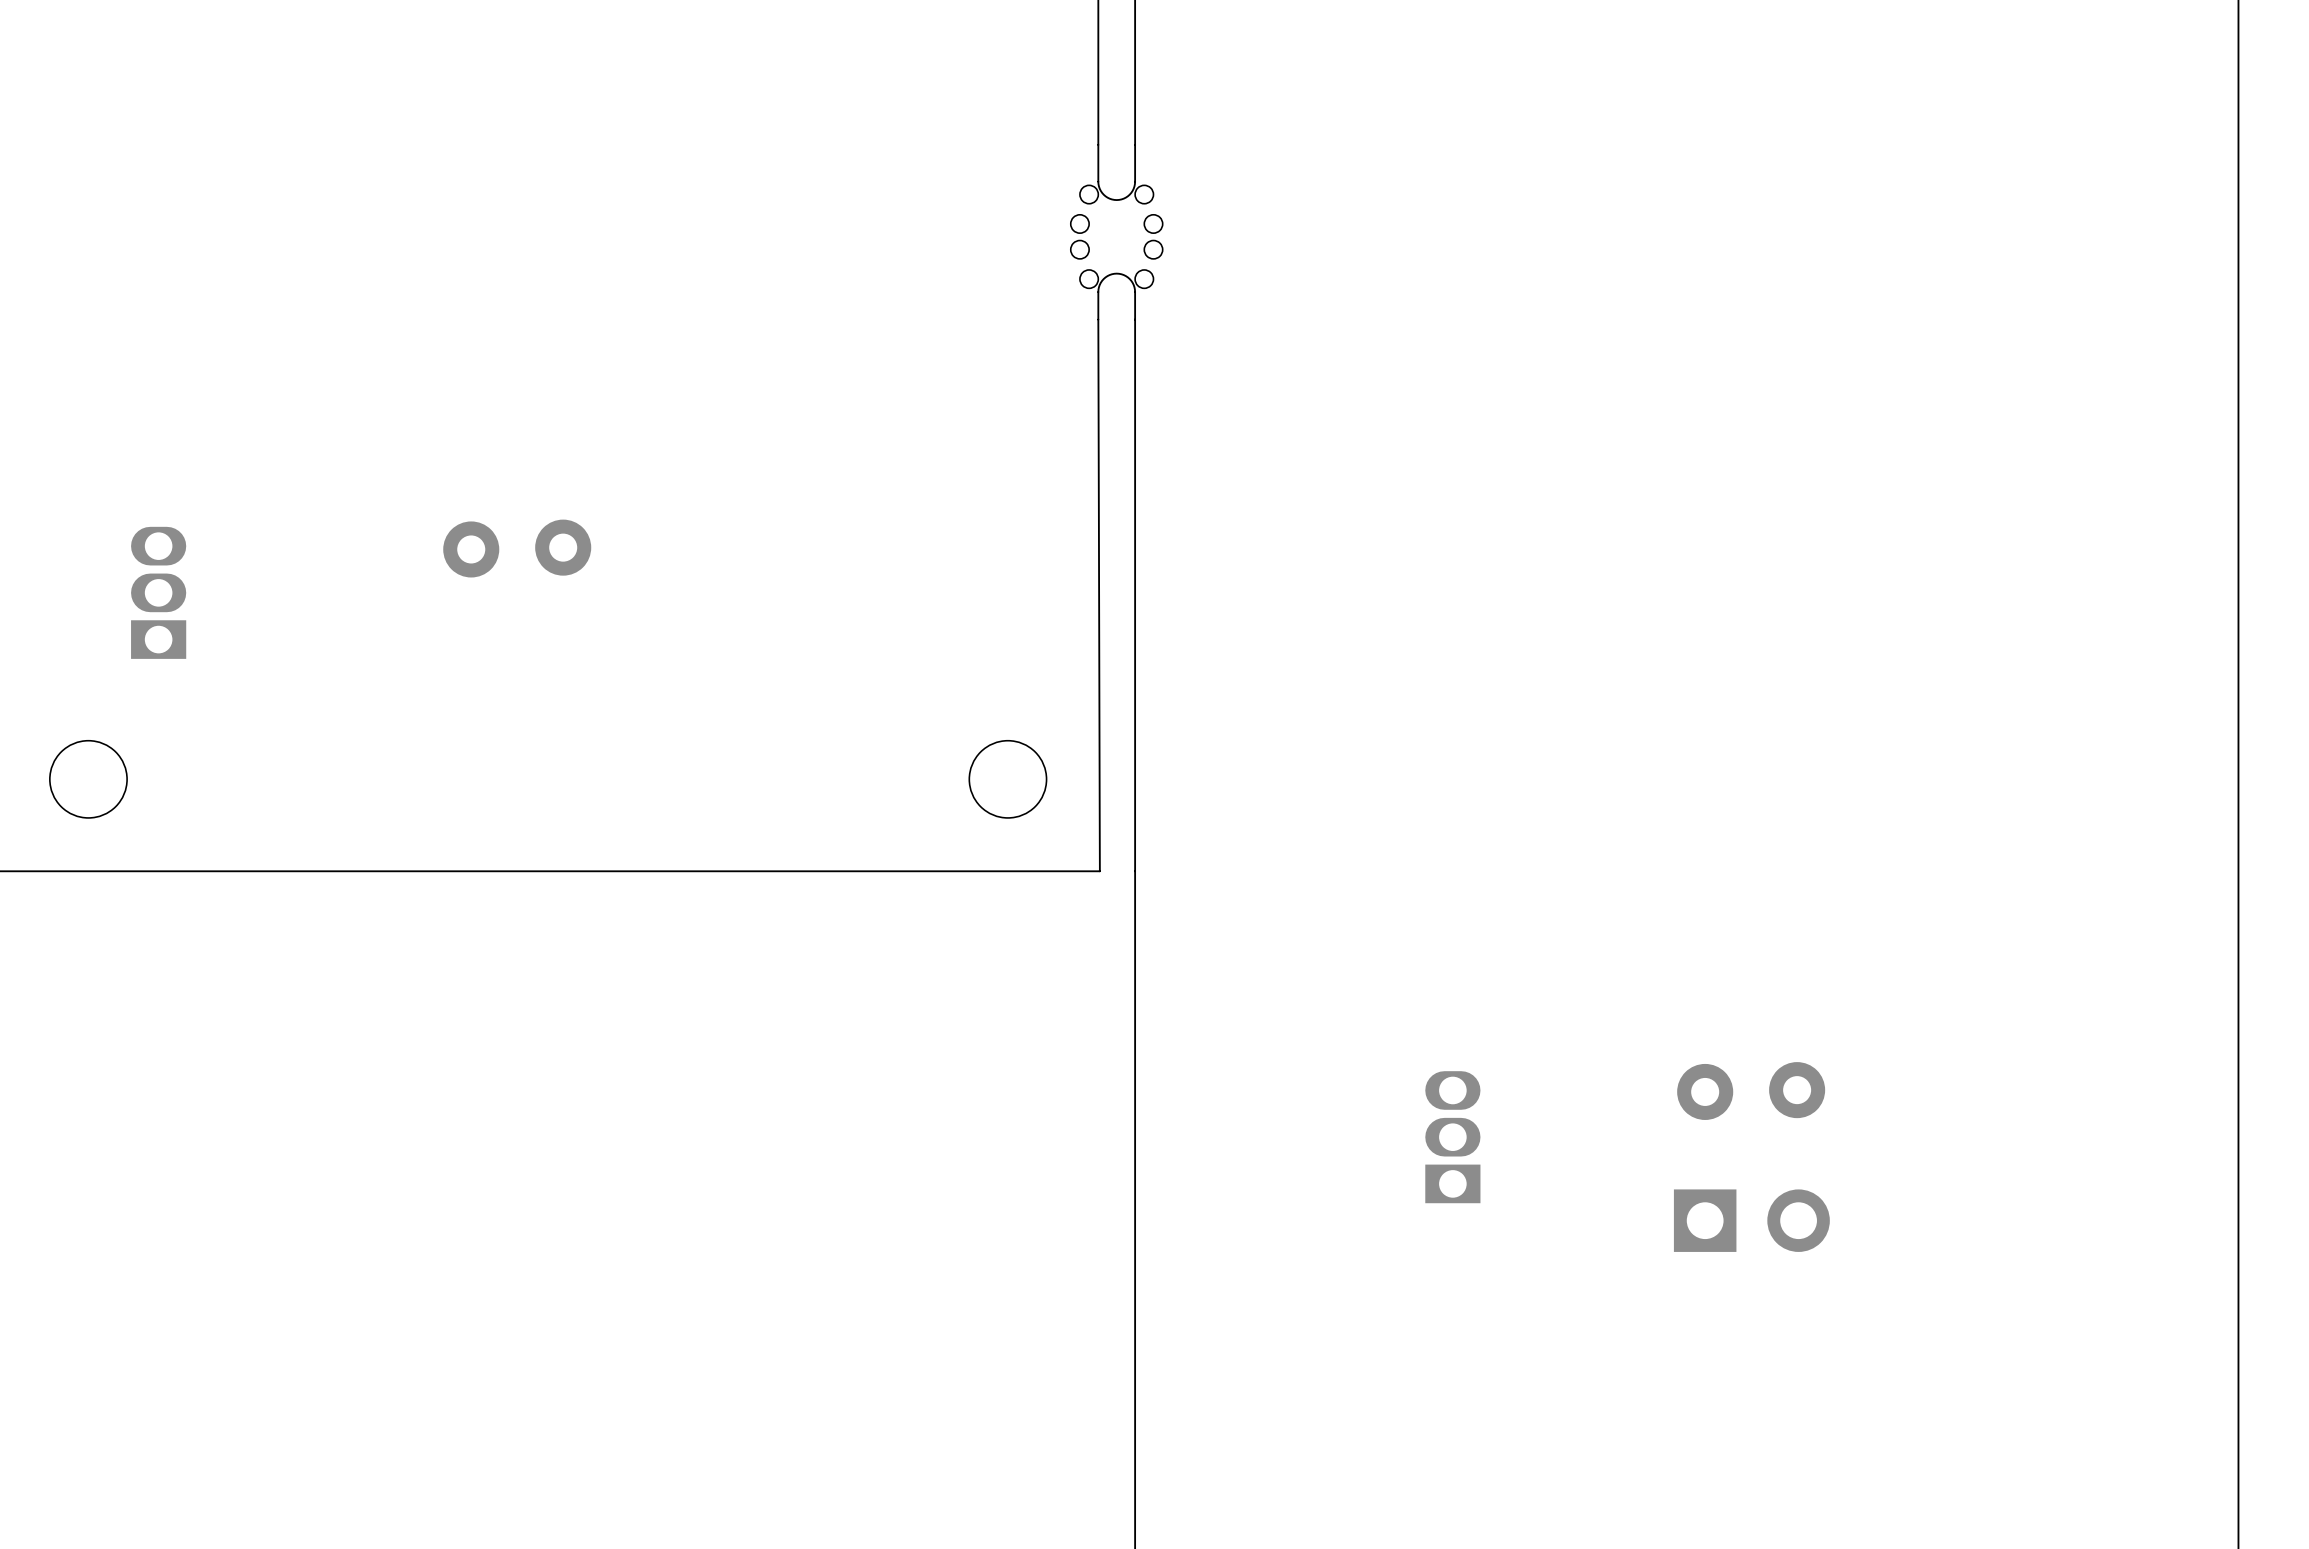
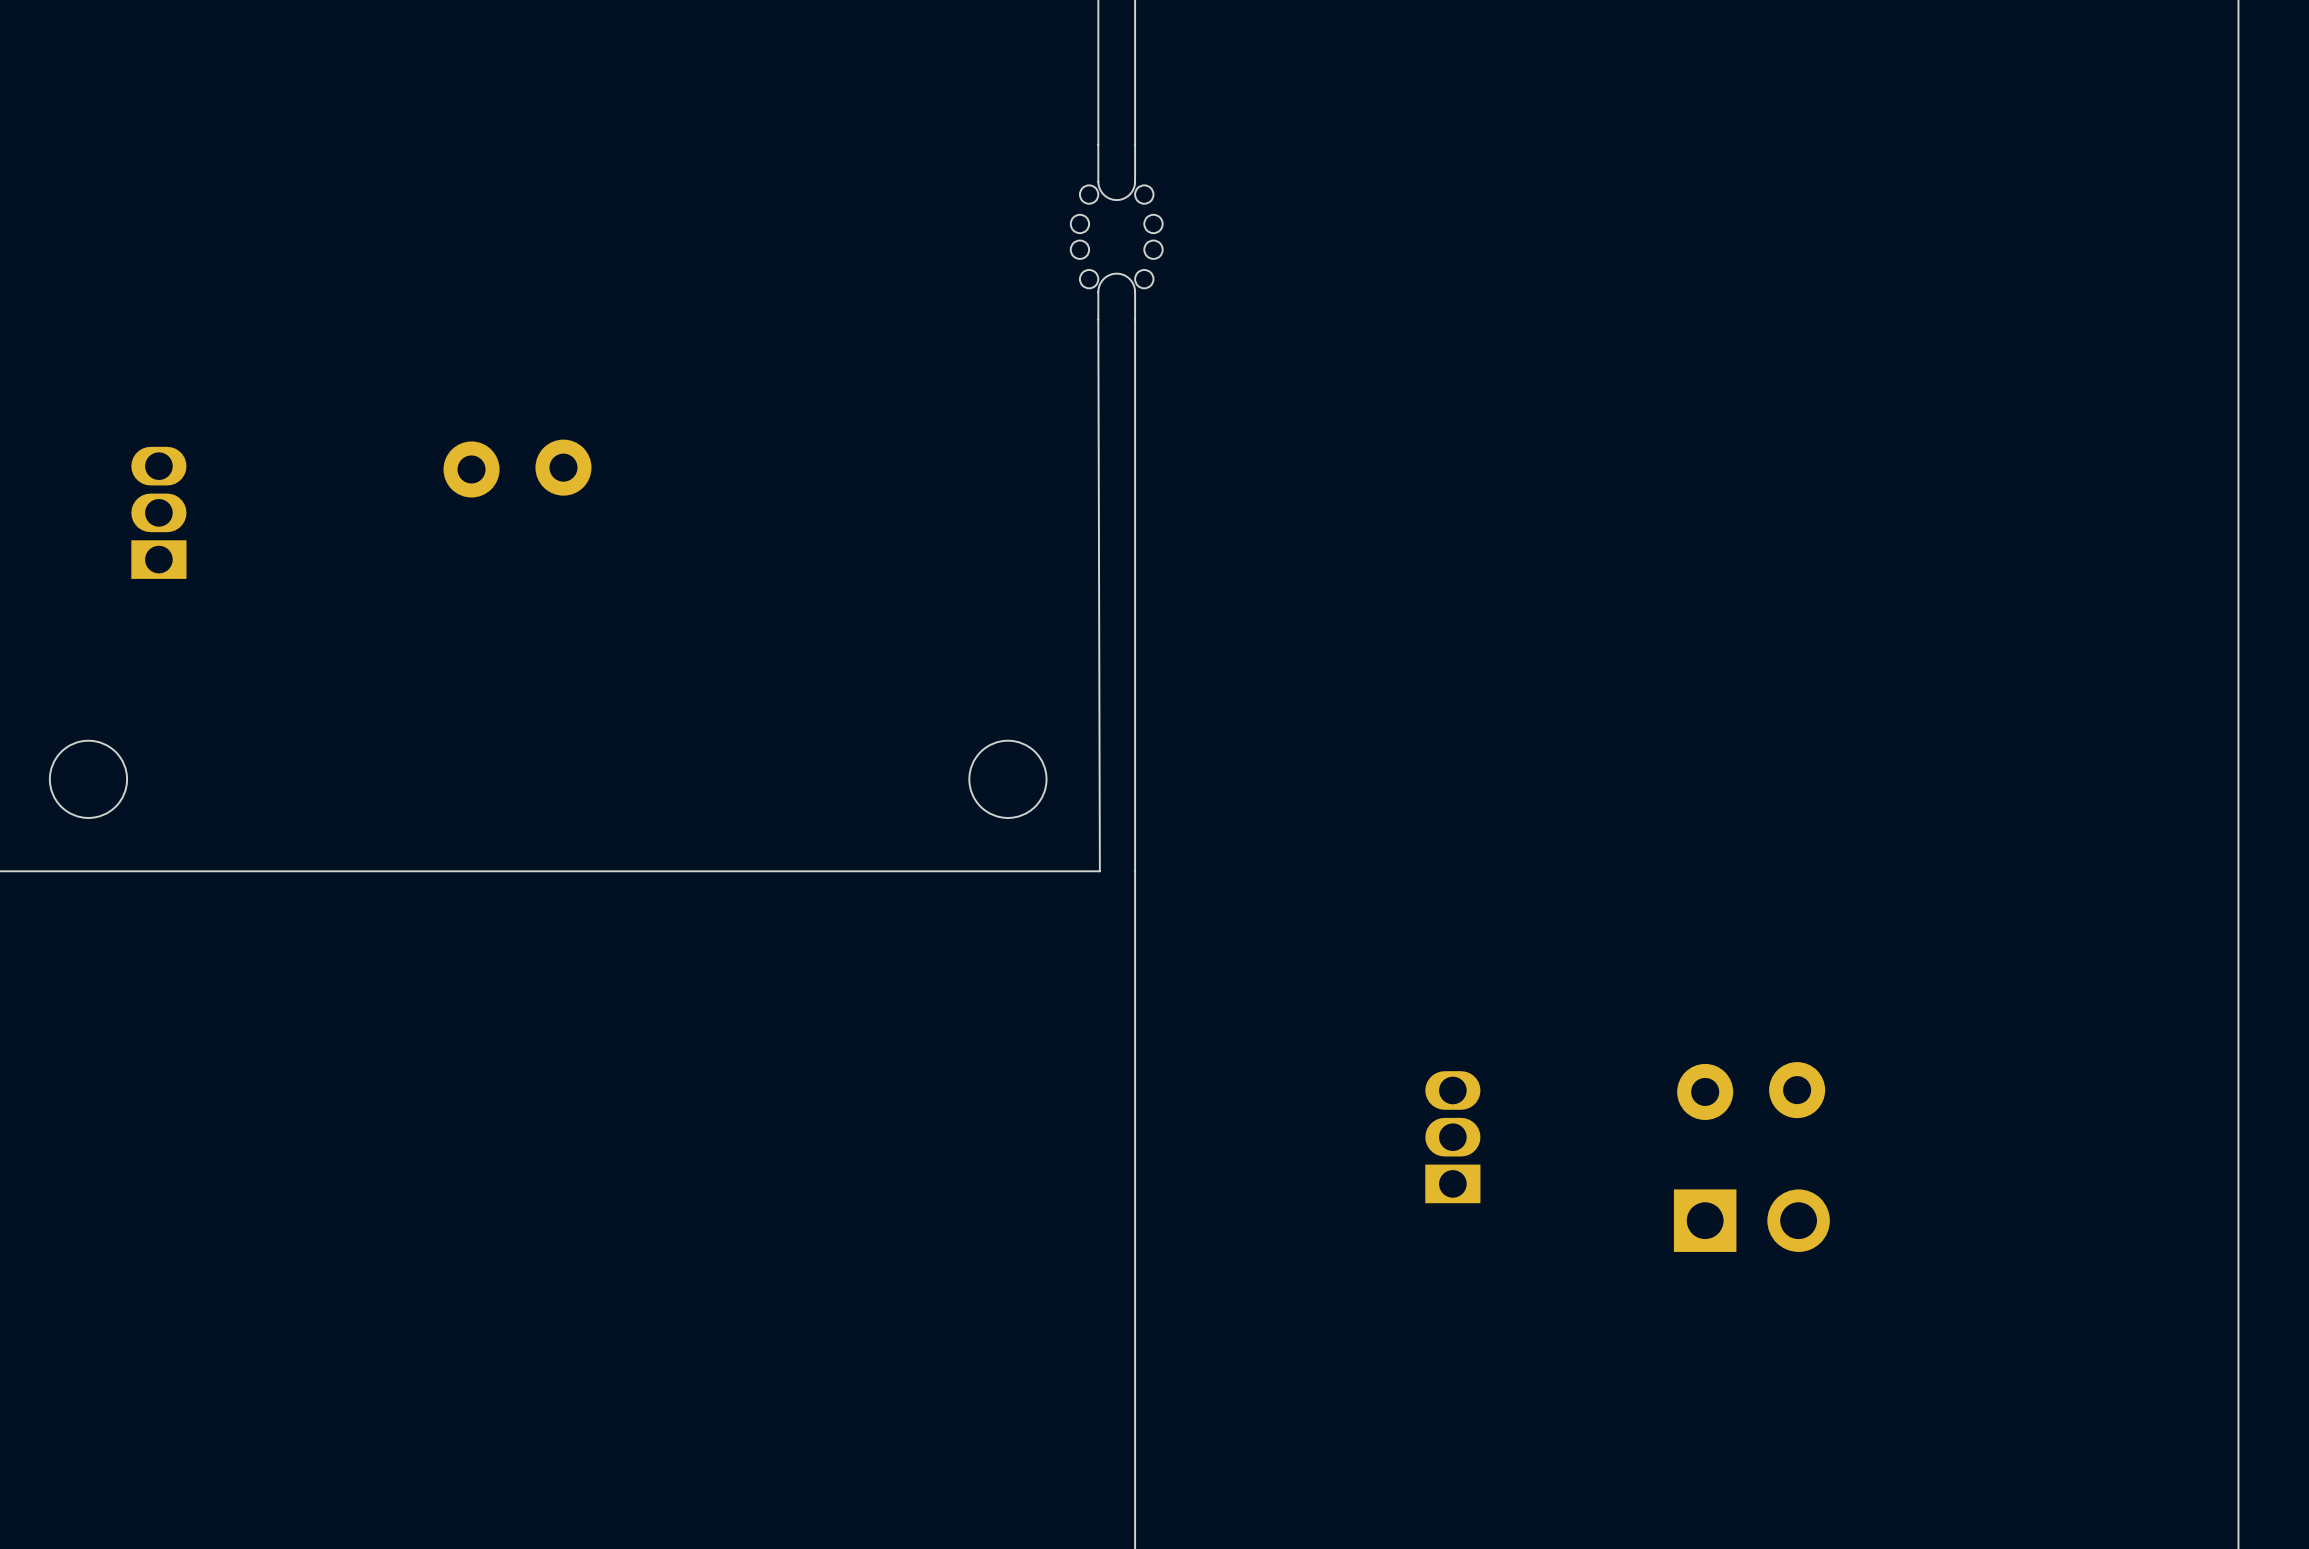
part position: (517, 548) -> (517, 468)
part position: (158, 592) -> (158, 512)

